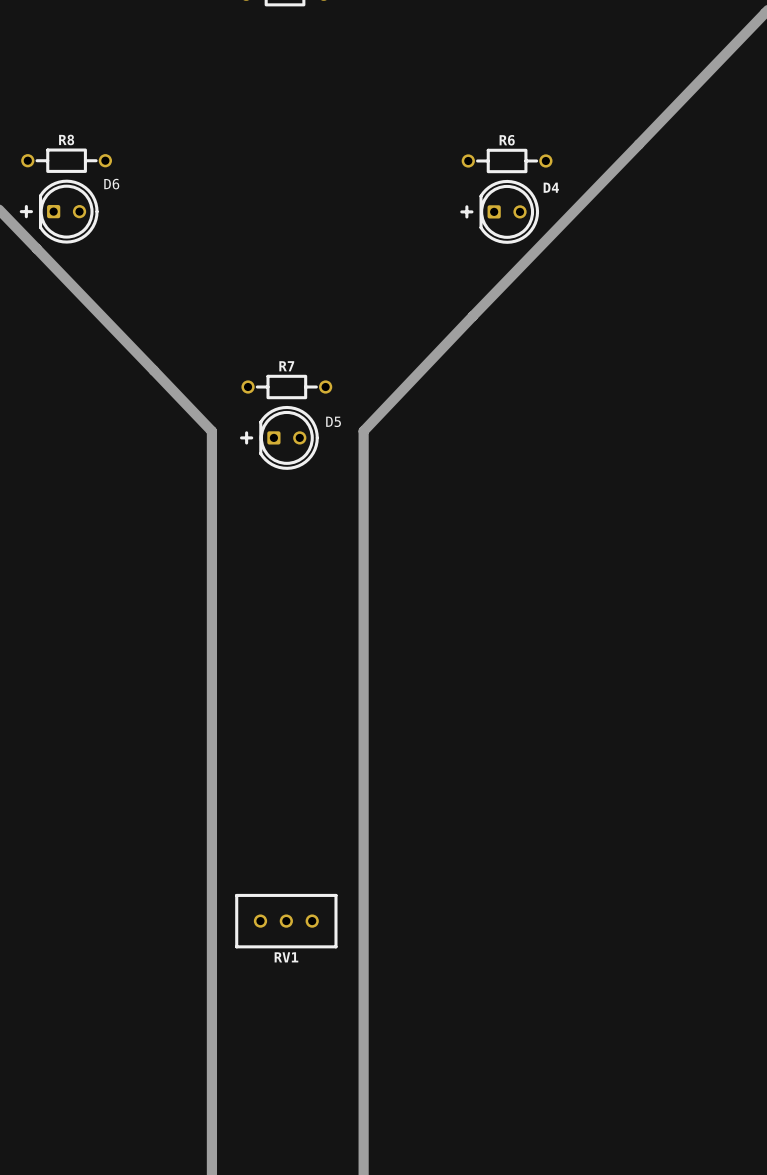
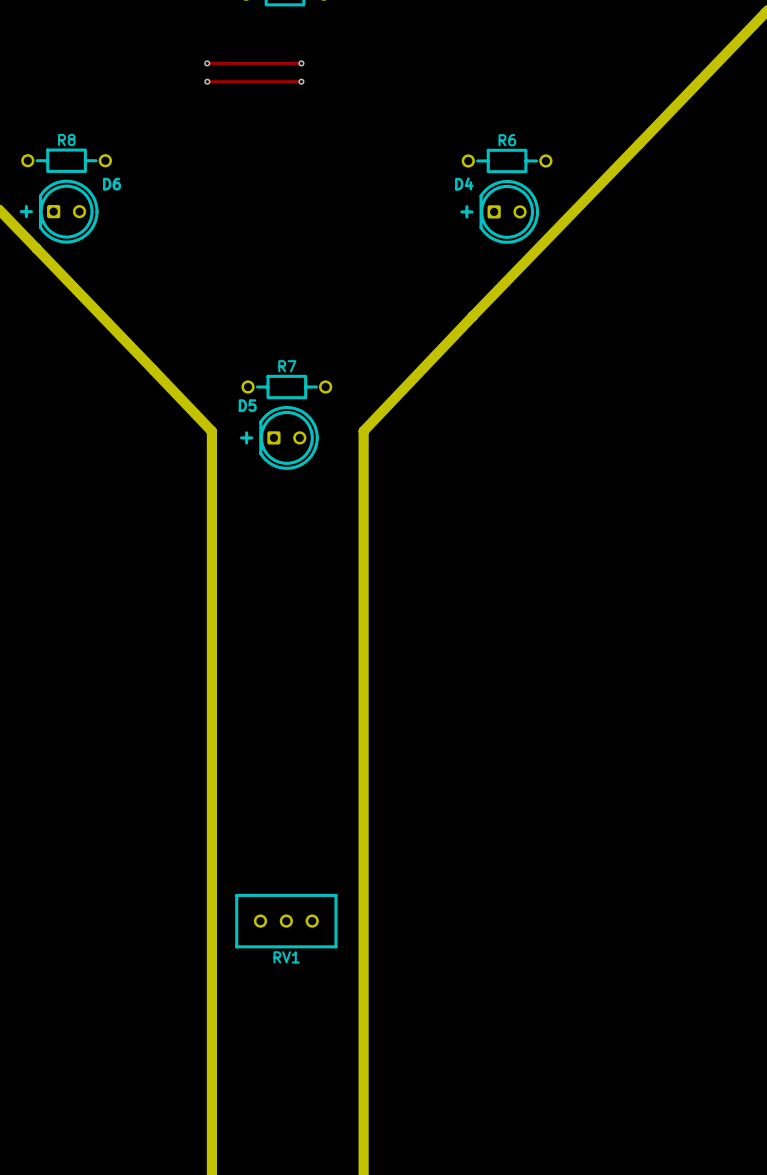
track: none -> (207, 63) (301, 63)
via: none -> (207, 63)
via: none -> (301, 63)
track: none -> (207, 81) (301, 81)
via: none -> (207, 81)
via: none -> (301, 81)
D4 name position: D4 (551, 187) -> D4 (464, 183)
D5 name position: D5 (333, 421) -> D5 (247, 405)

